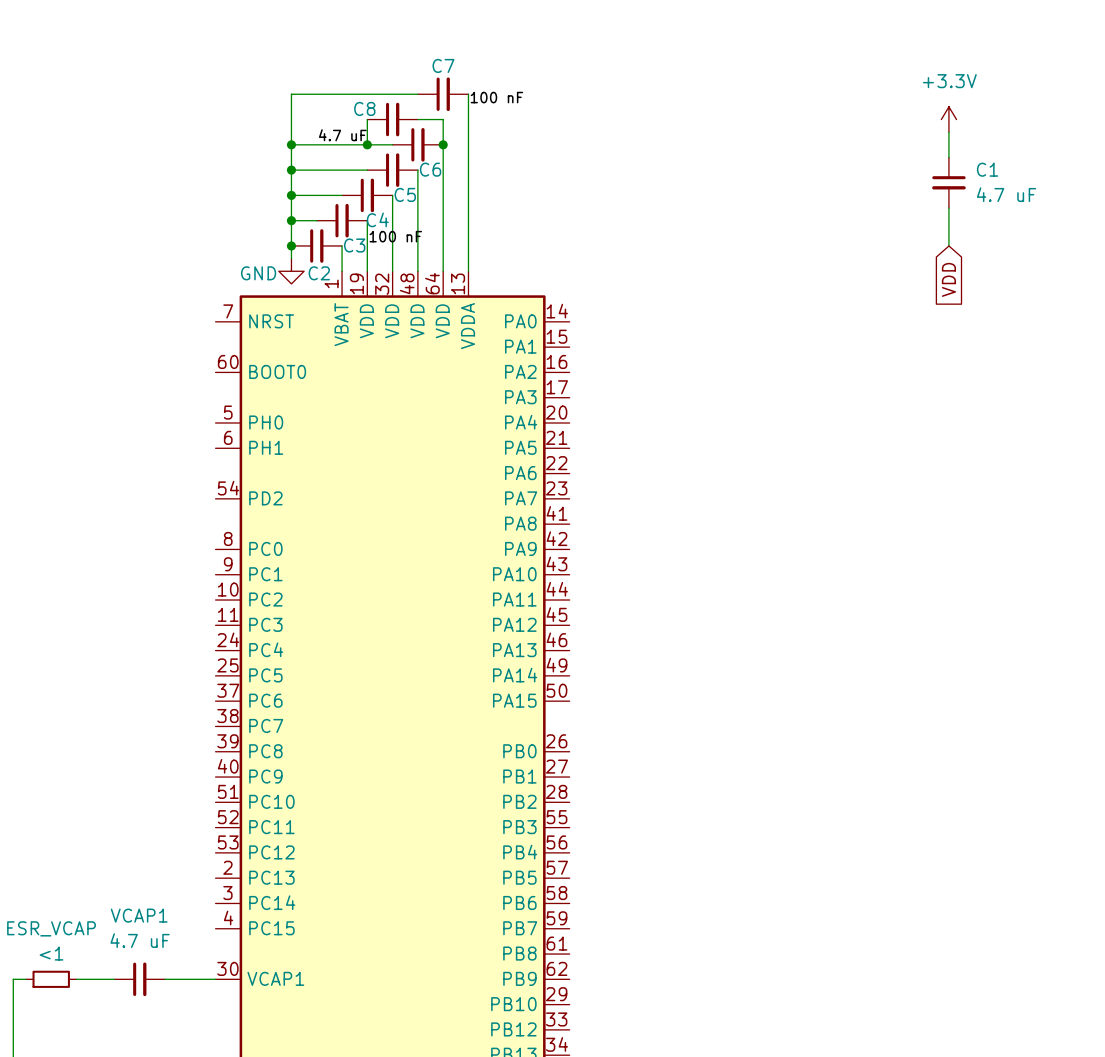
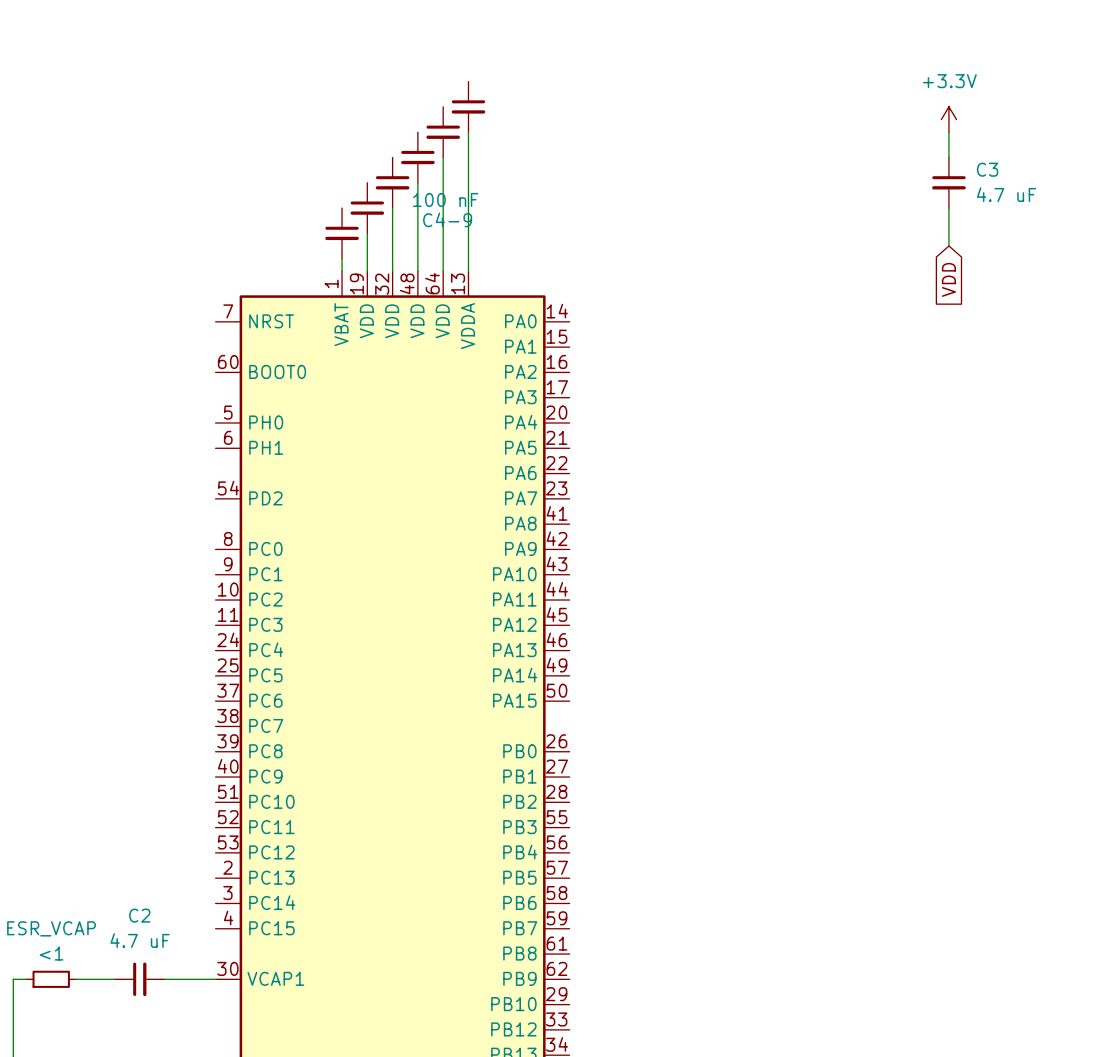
wire: (417, 94) (291, 94) (291, 258) -> none
C7: (443, 94) -> none
label: 100 nF (496, 97) -> none
part: none -> (468, 106)
wire: (367, 119) (367, 144) -> none
C8: (392, 119) -> none
wire: (417, 119) (443, 119) (443, 157) -> none
part: none -> (443, 132)
label: 4.7 uF (342, 135) -> none
wire: (291, 144) (392, 144) -> none
junction: (291, 144) -> none
junction: (367, 144) -> none
C6: (417, 144) -> none
junction: (443, 144) -> none
part: none -> (417, 157)
C1 name: C1 (987, 169) -> C3 (987, 169)
wire: (291, 170) (367, 170) -> none
junction: (291, 170) -> none
C5: (392, 170) -> none
part: none -> (392, 182)
wire: (291, 195) (342, 195) -> none
junction: (291, 195) -> none
C4: (367, 195) -> none
part: none -> (367, 208)
wire: (291, 220) (316, 220) -> none
junction: (291, 220) -> none
C3: (342, 220) -> none
C4-9: none -> 100 nF (342, 233)
label: 100 nF (395, 236) -> none
junction: (291, 245) -> none
C2: (316, 245) -> none
power symbol: GND (291, 271) -> none
VCAP1 name: VCAP1 (139, 915) -> C2 (139, 915)

